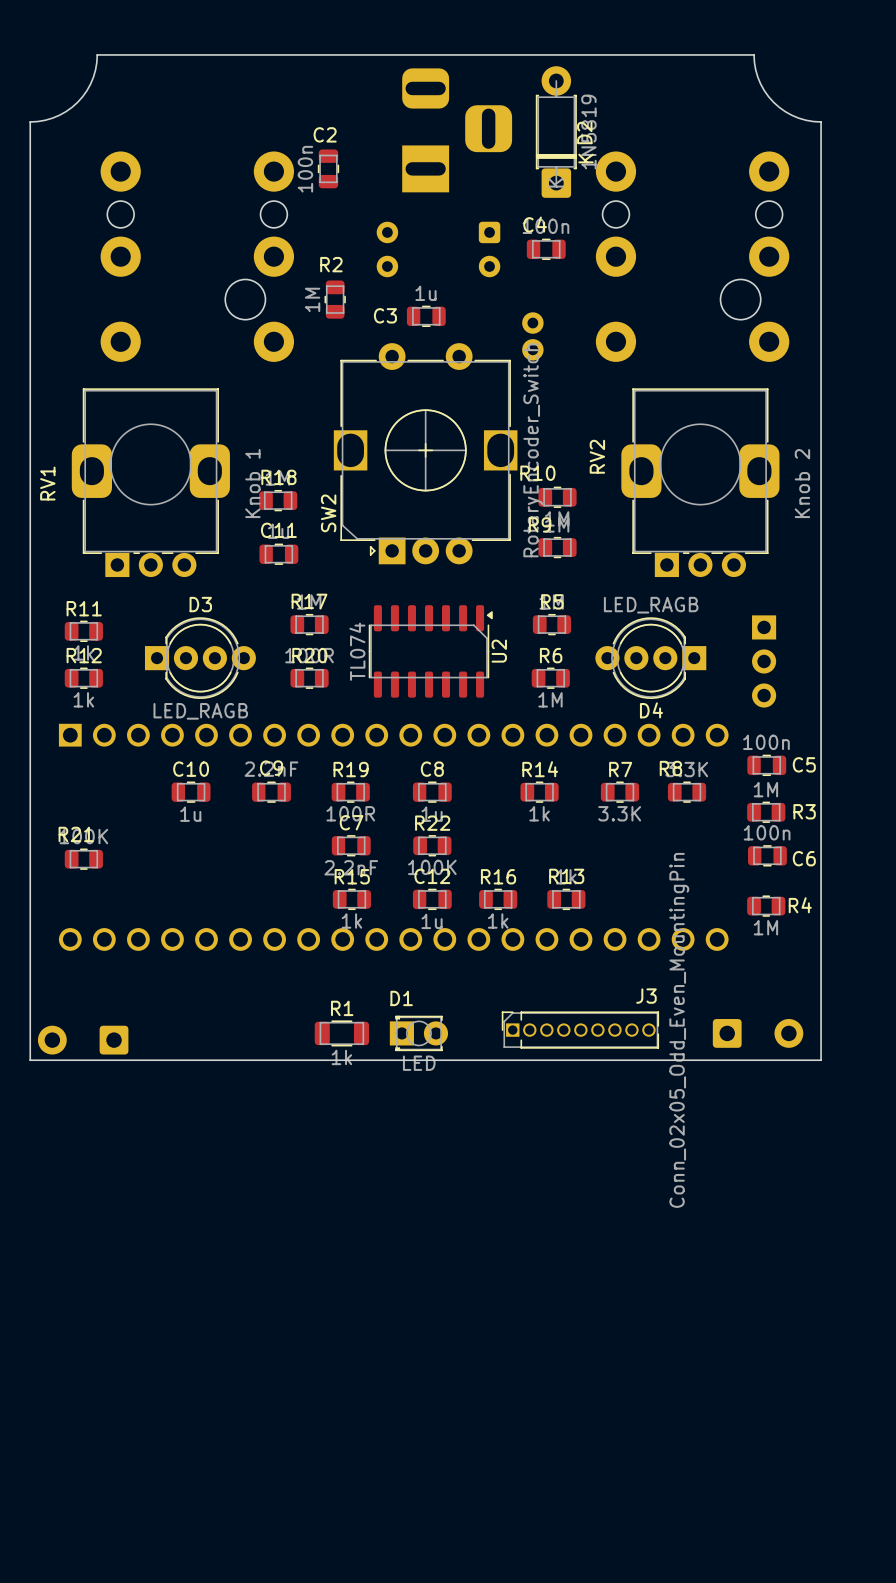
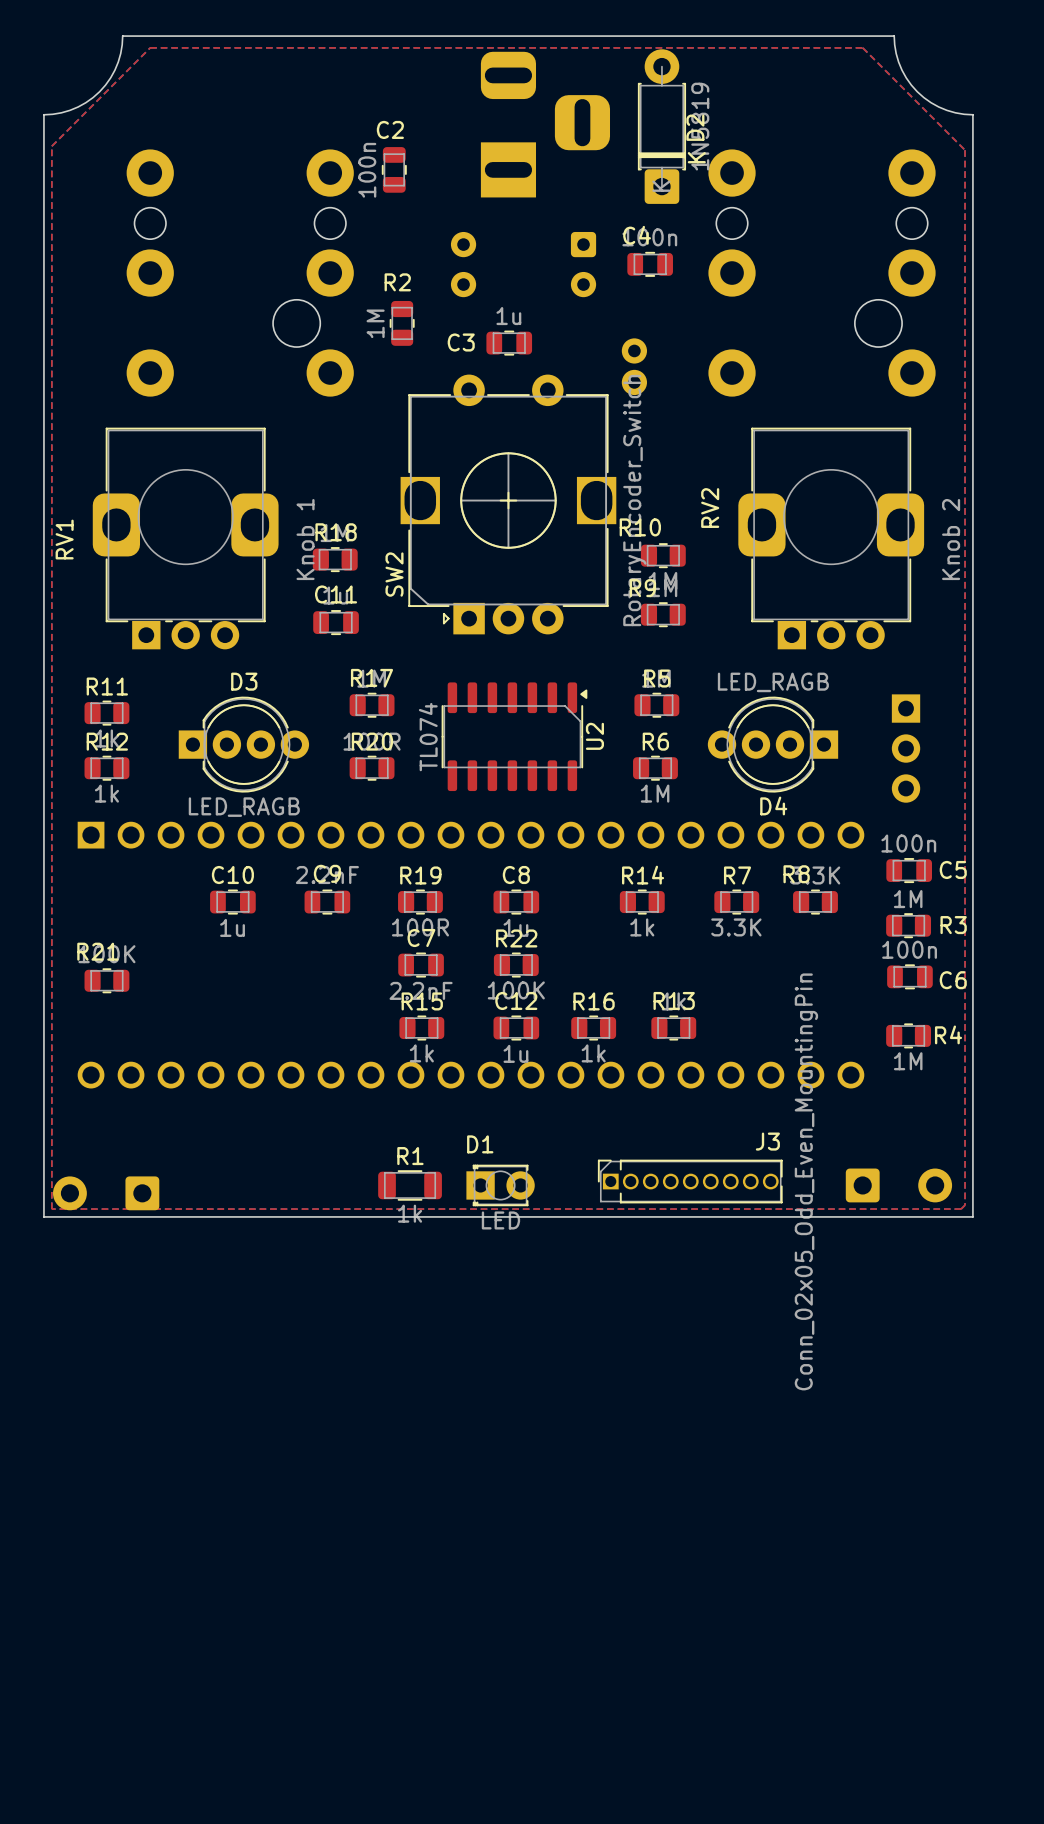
top zone outline: none -> (150, 47) (51, 146) (51, 1209) (961, 1209) (965, 1205) (965, 150) (862, 47) (150, 47)

